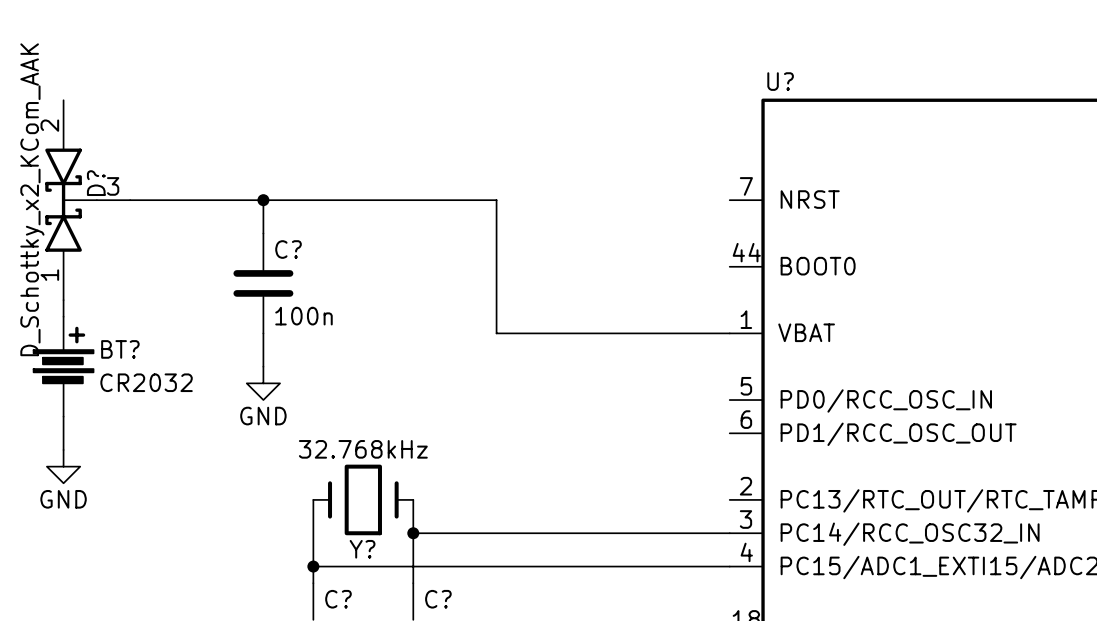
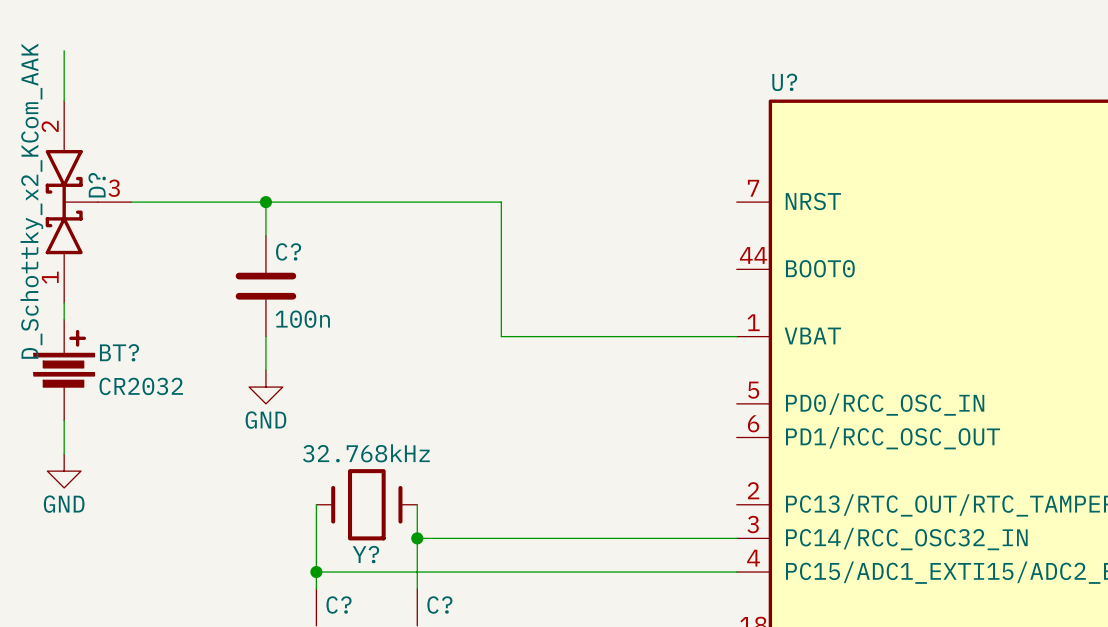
wire: none -> (64, 50) (64, 101)

